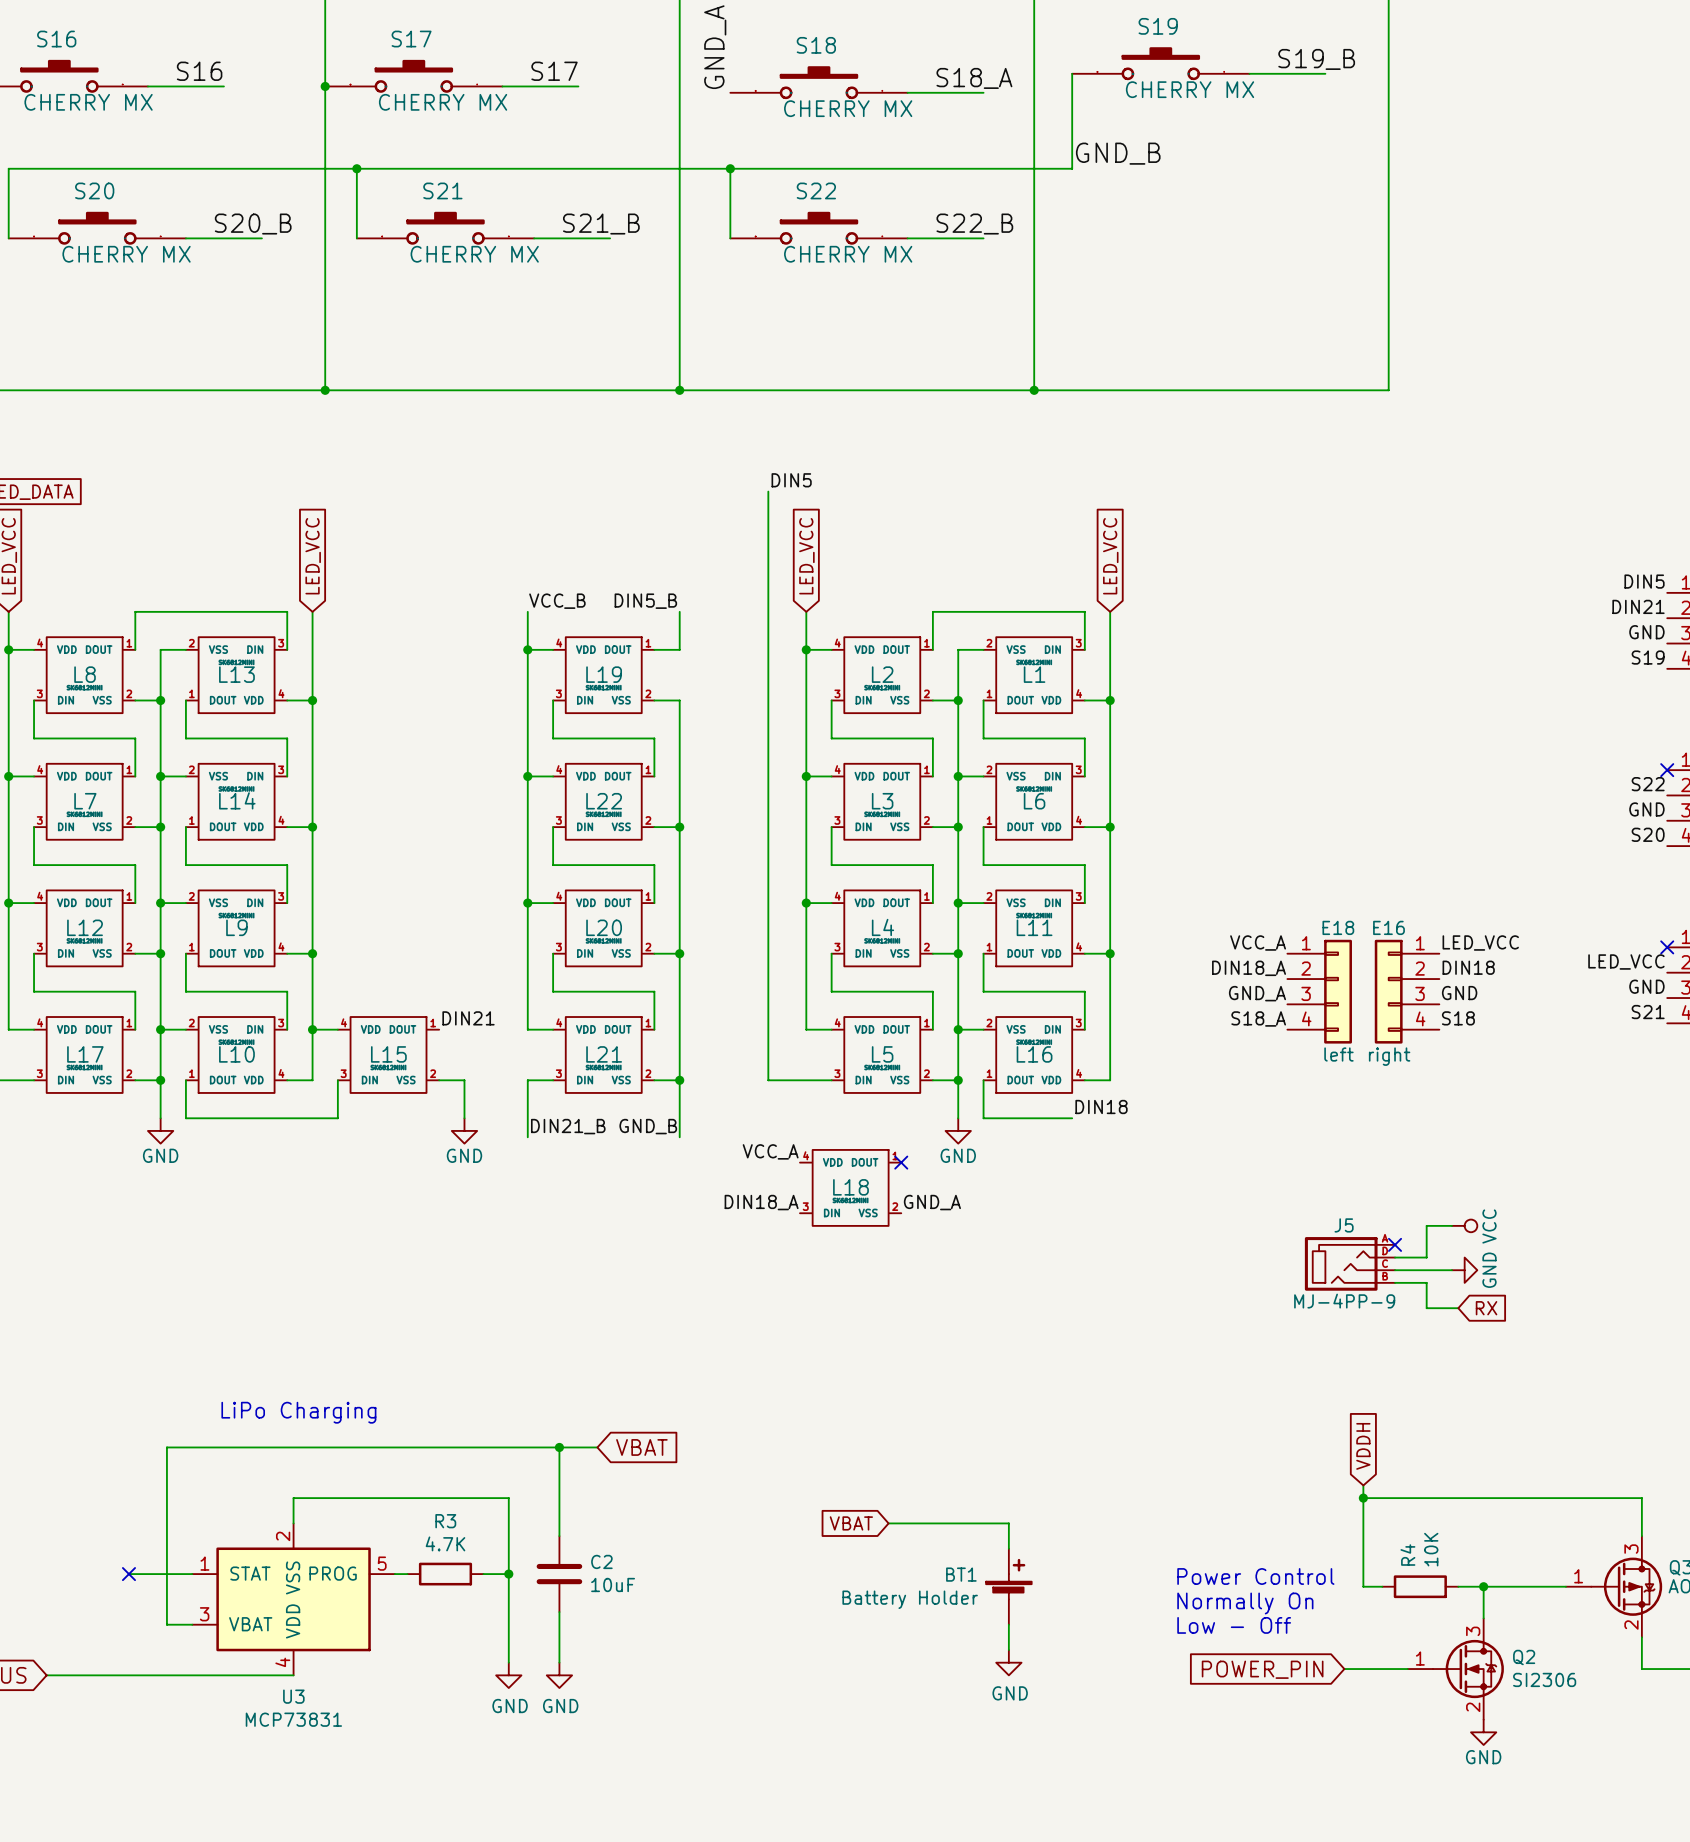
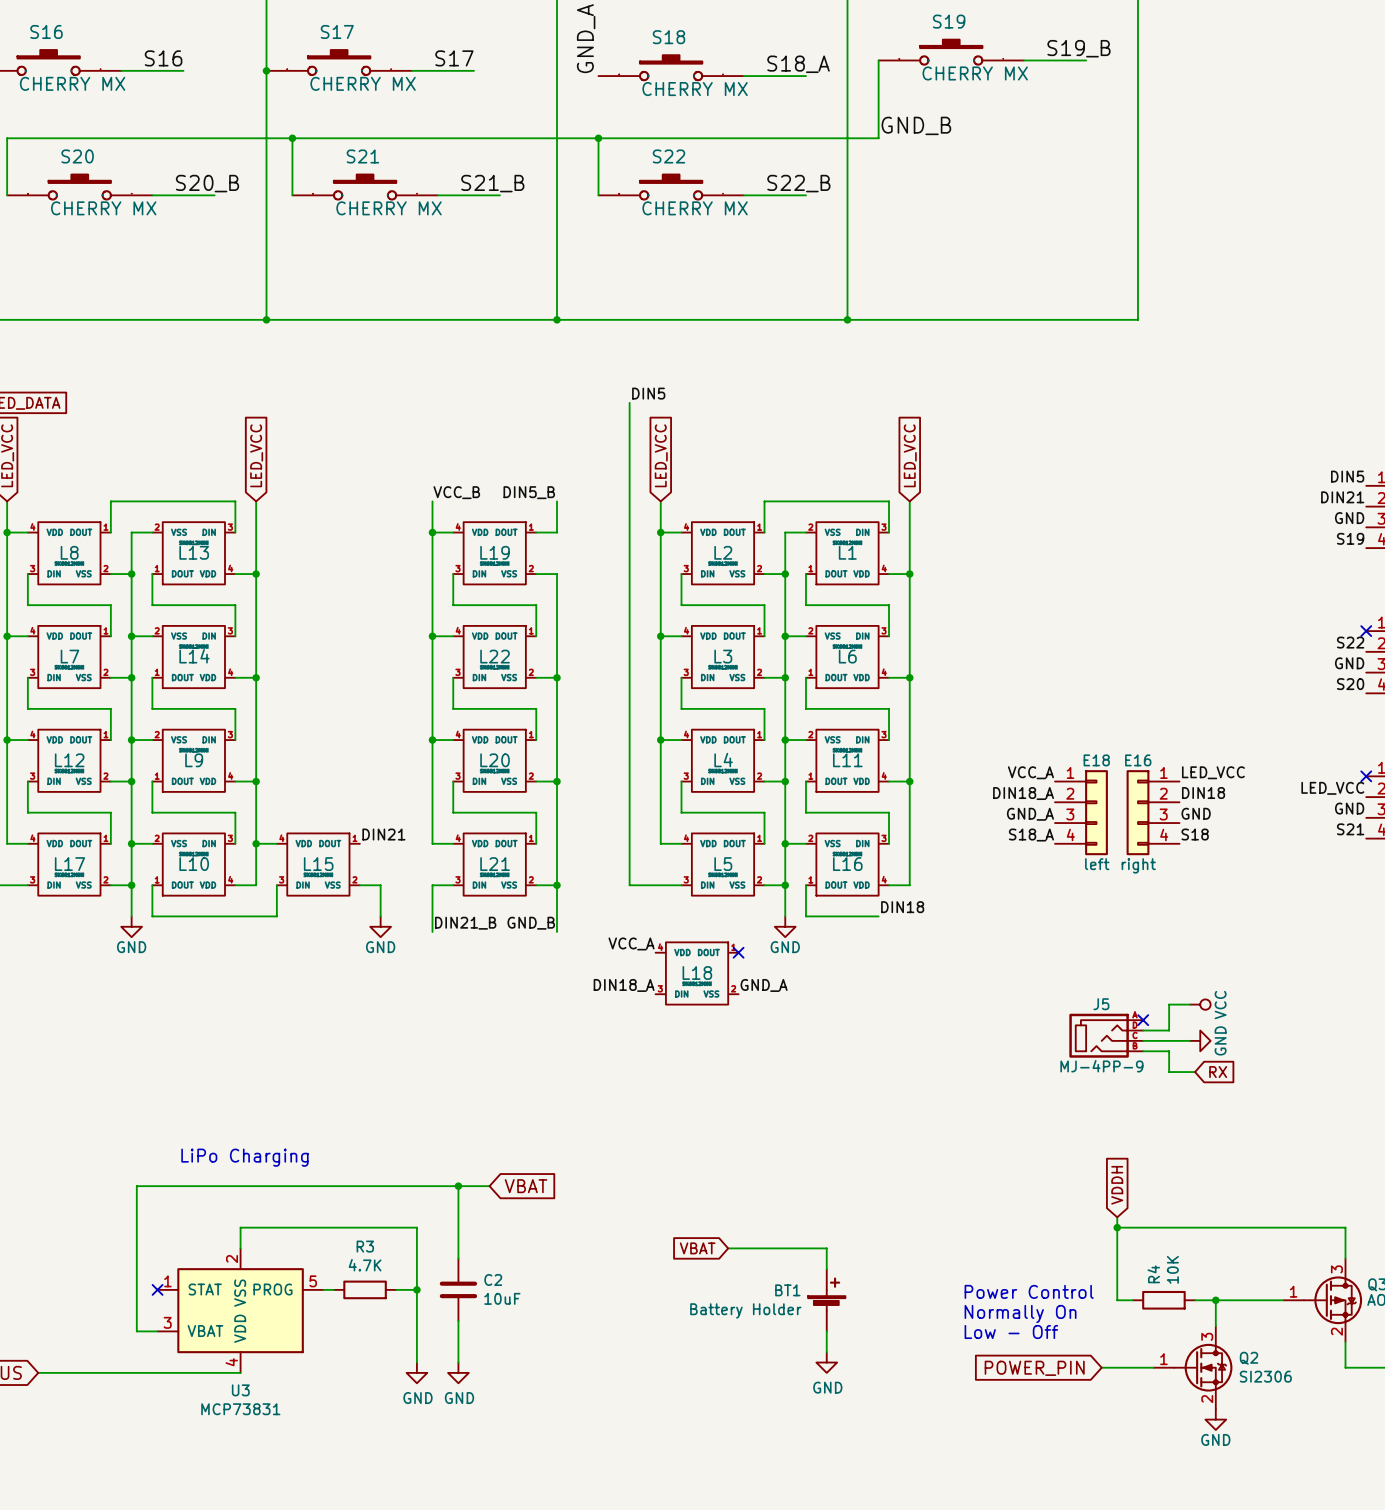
wire: (128, 1574) (192, 1574) -> none
no-connect mark: (128, 1574) -> none
no-connect mark: none -> (157, 1289)

